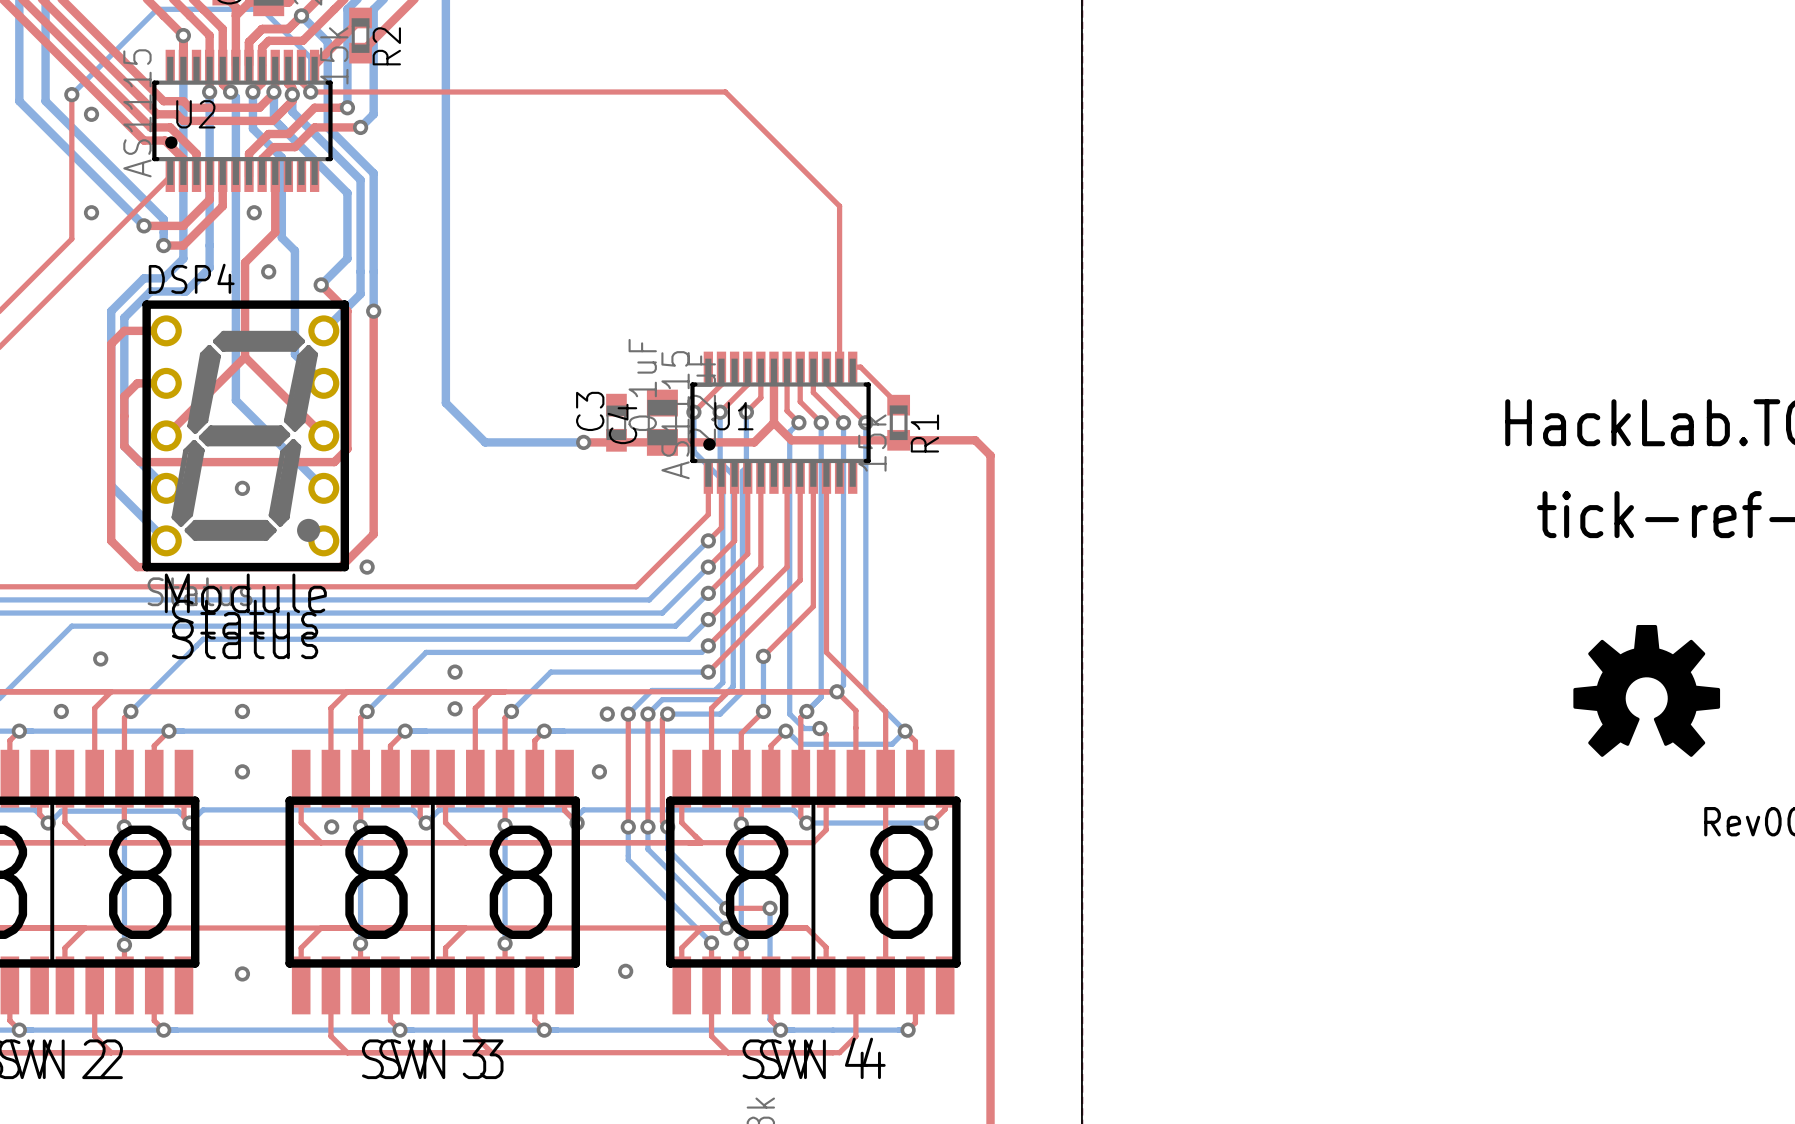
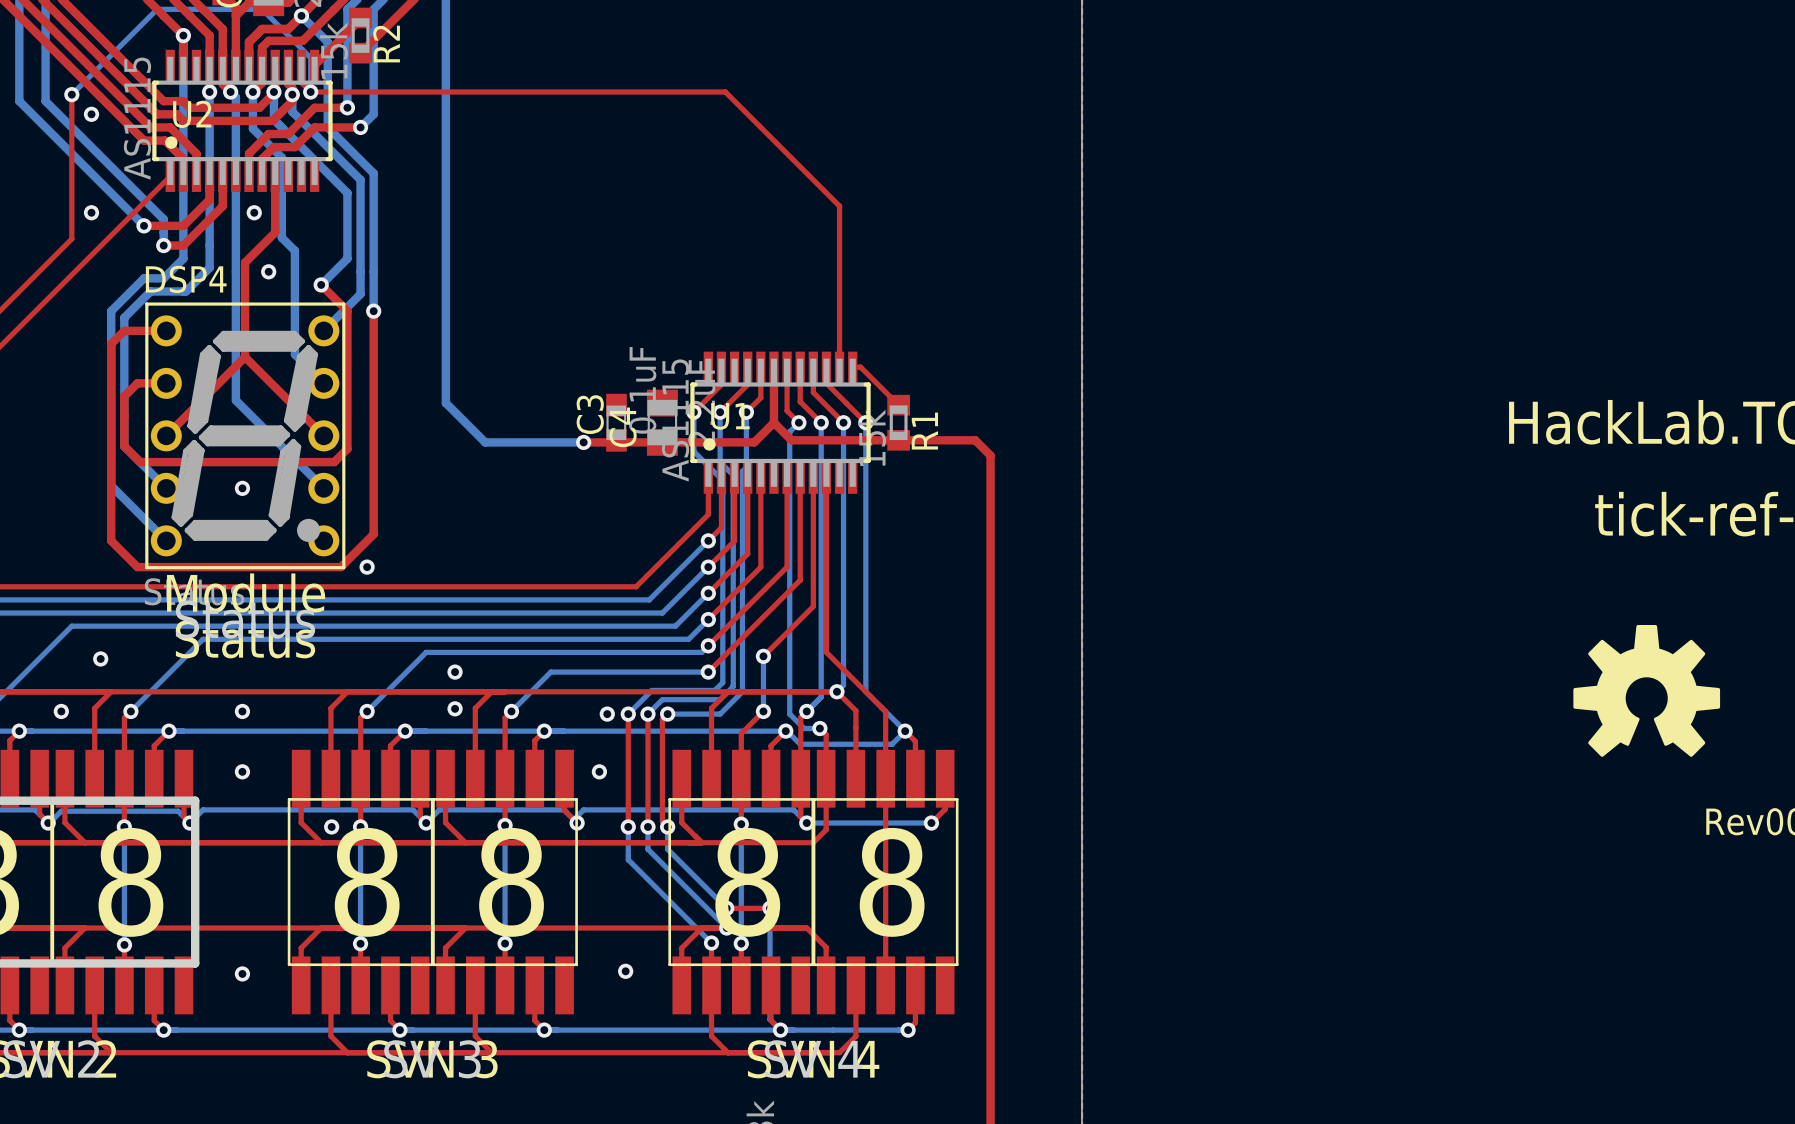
board edge: (146, 304) (344, 304) (344, 567) (146, 567) (146, 304) -> none
board edge: (289, 800) (575, 800) (575, 963) (289, 963) (289, 800) -> none
board edge: (670, 800) (956, 800) (956, 963) (670, 963) (670, 800) -> none

